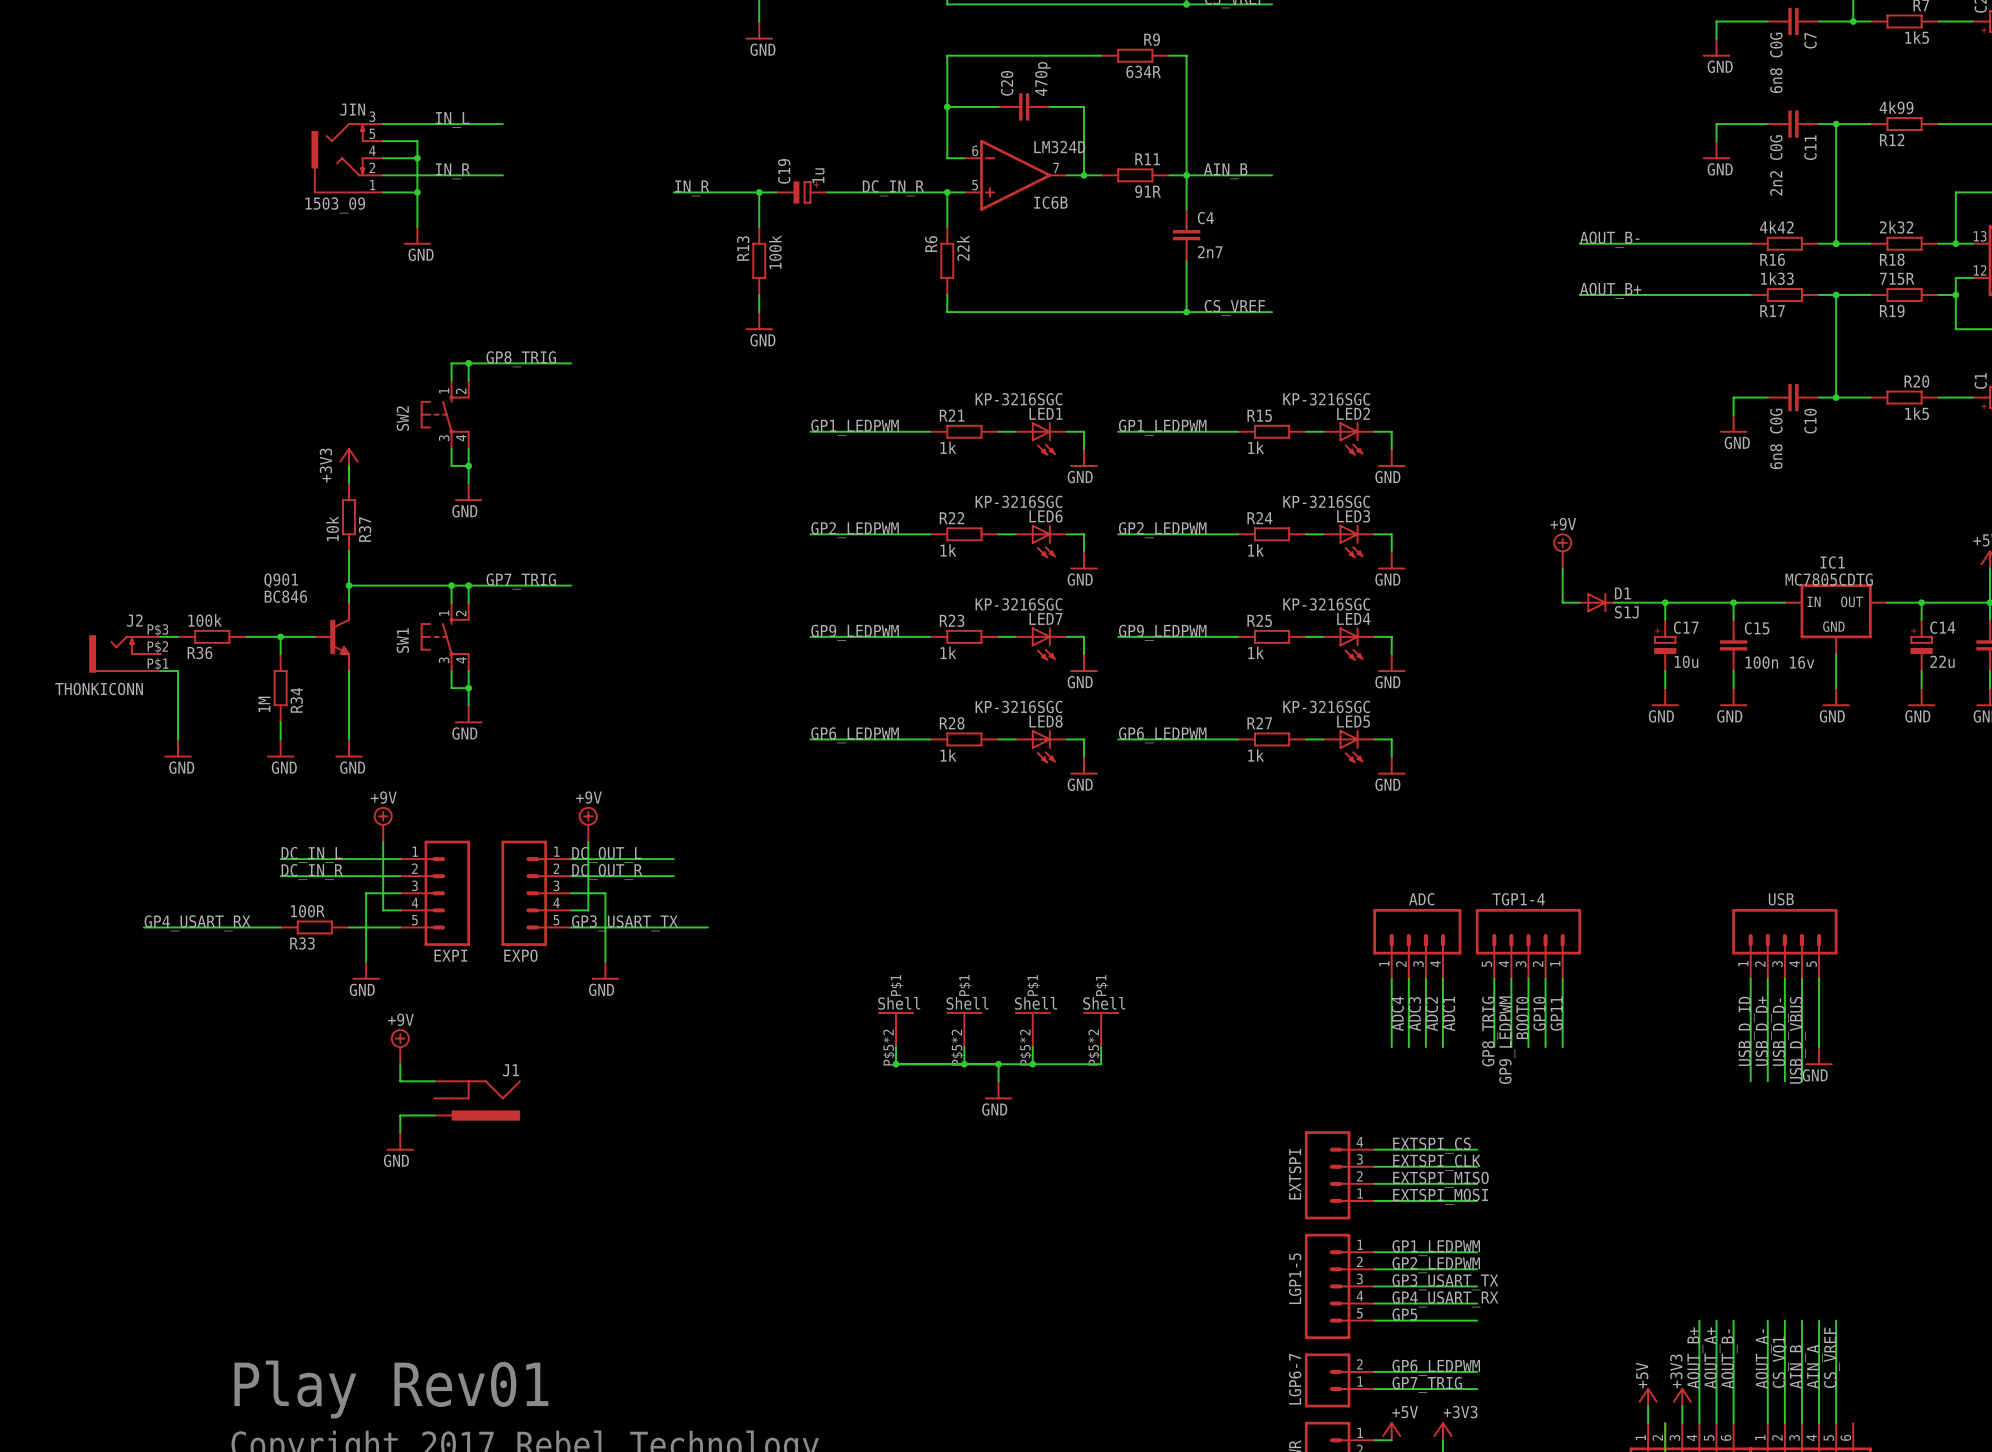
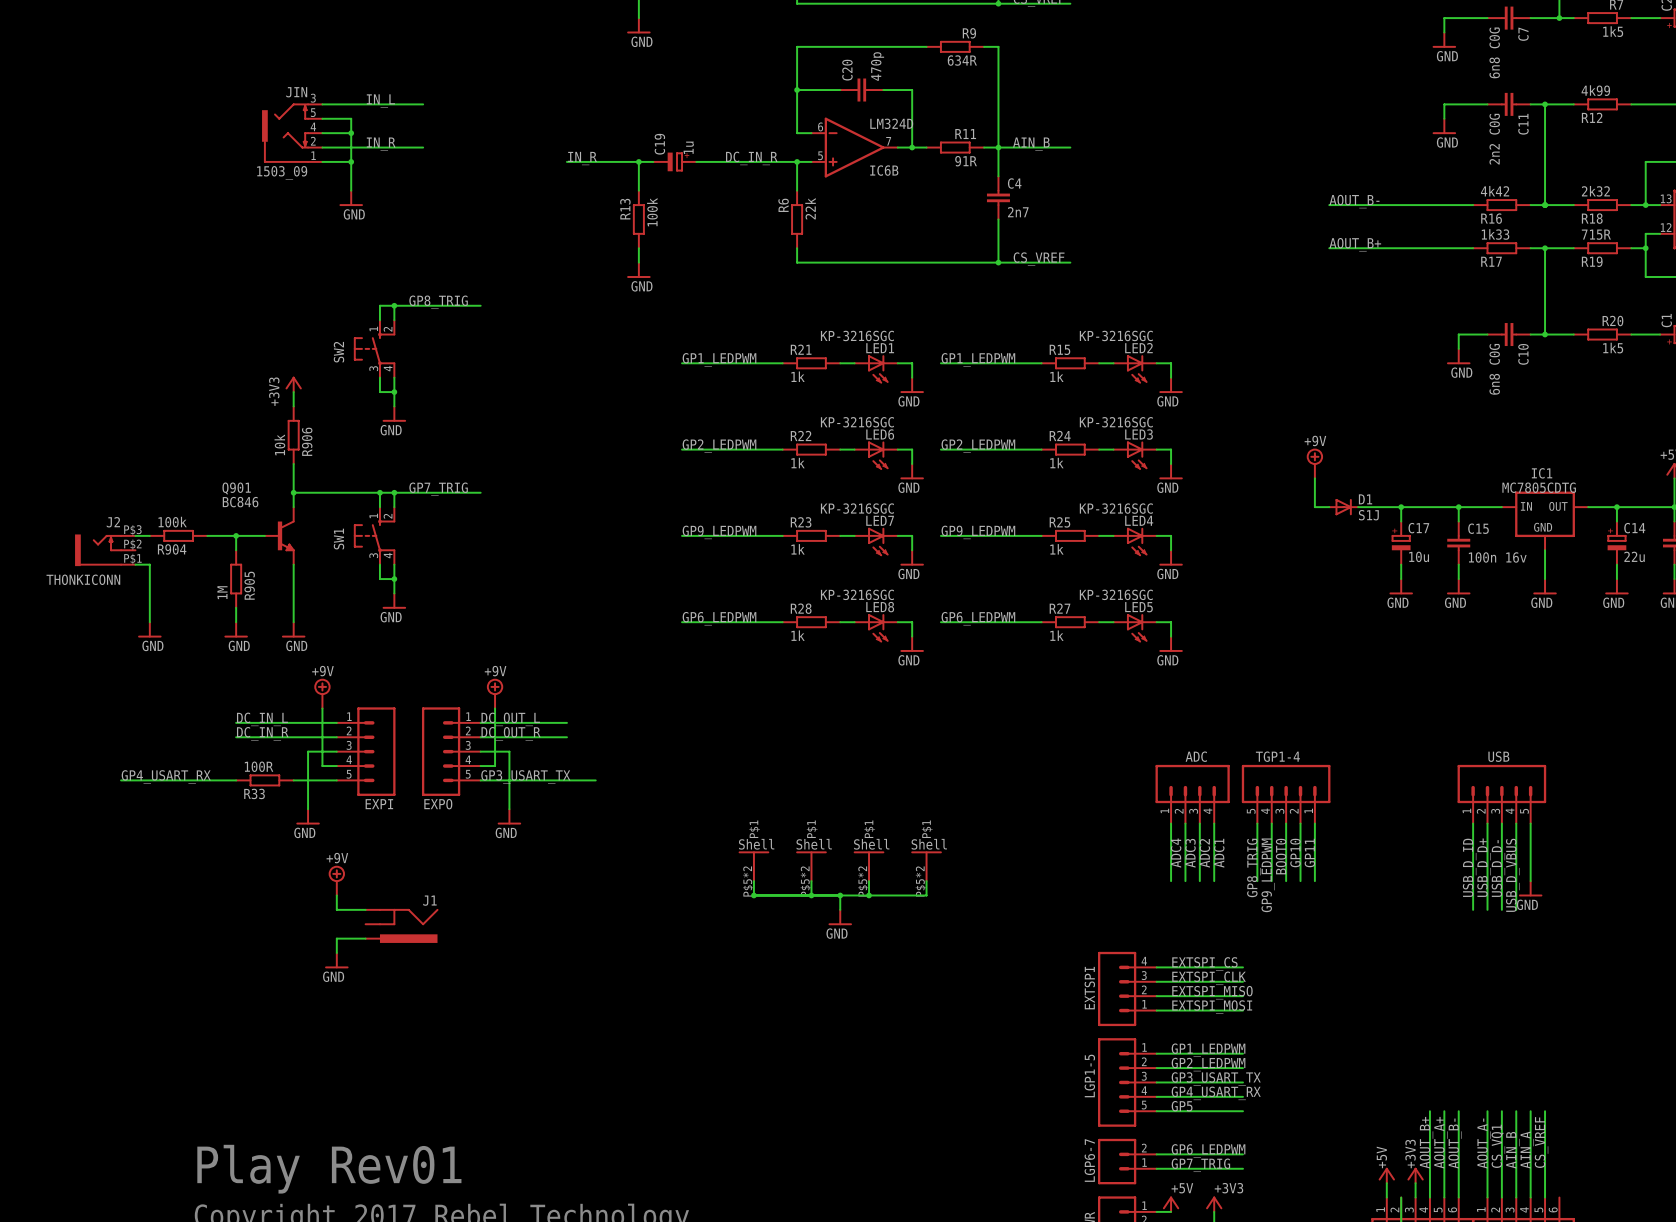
R37 name: R37 (365, 529) -> R906 (307, 441)
R36 name: R36 (200, 652) -> R904 (172, 549)
R34 name: R34 (296, 700) -> R905 (249, 585)

